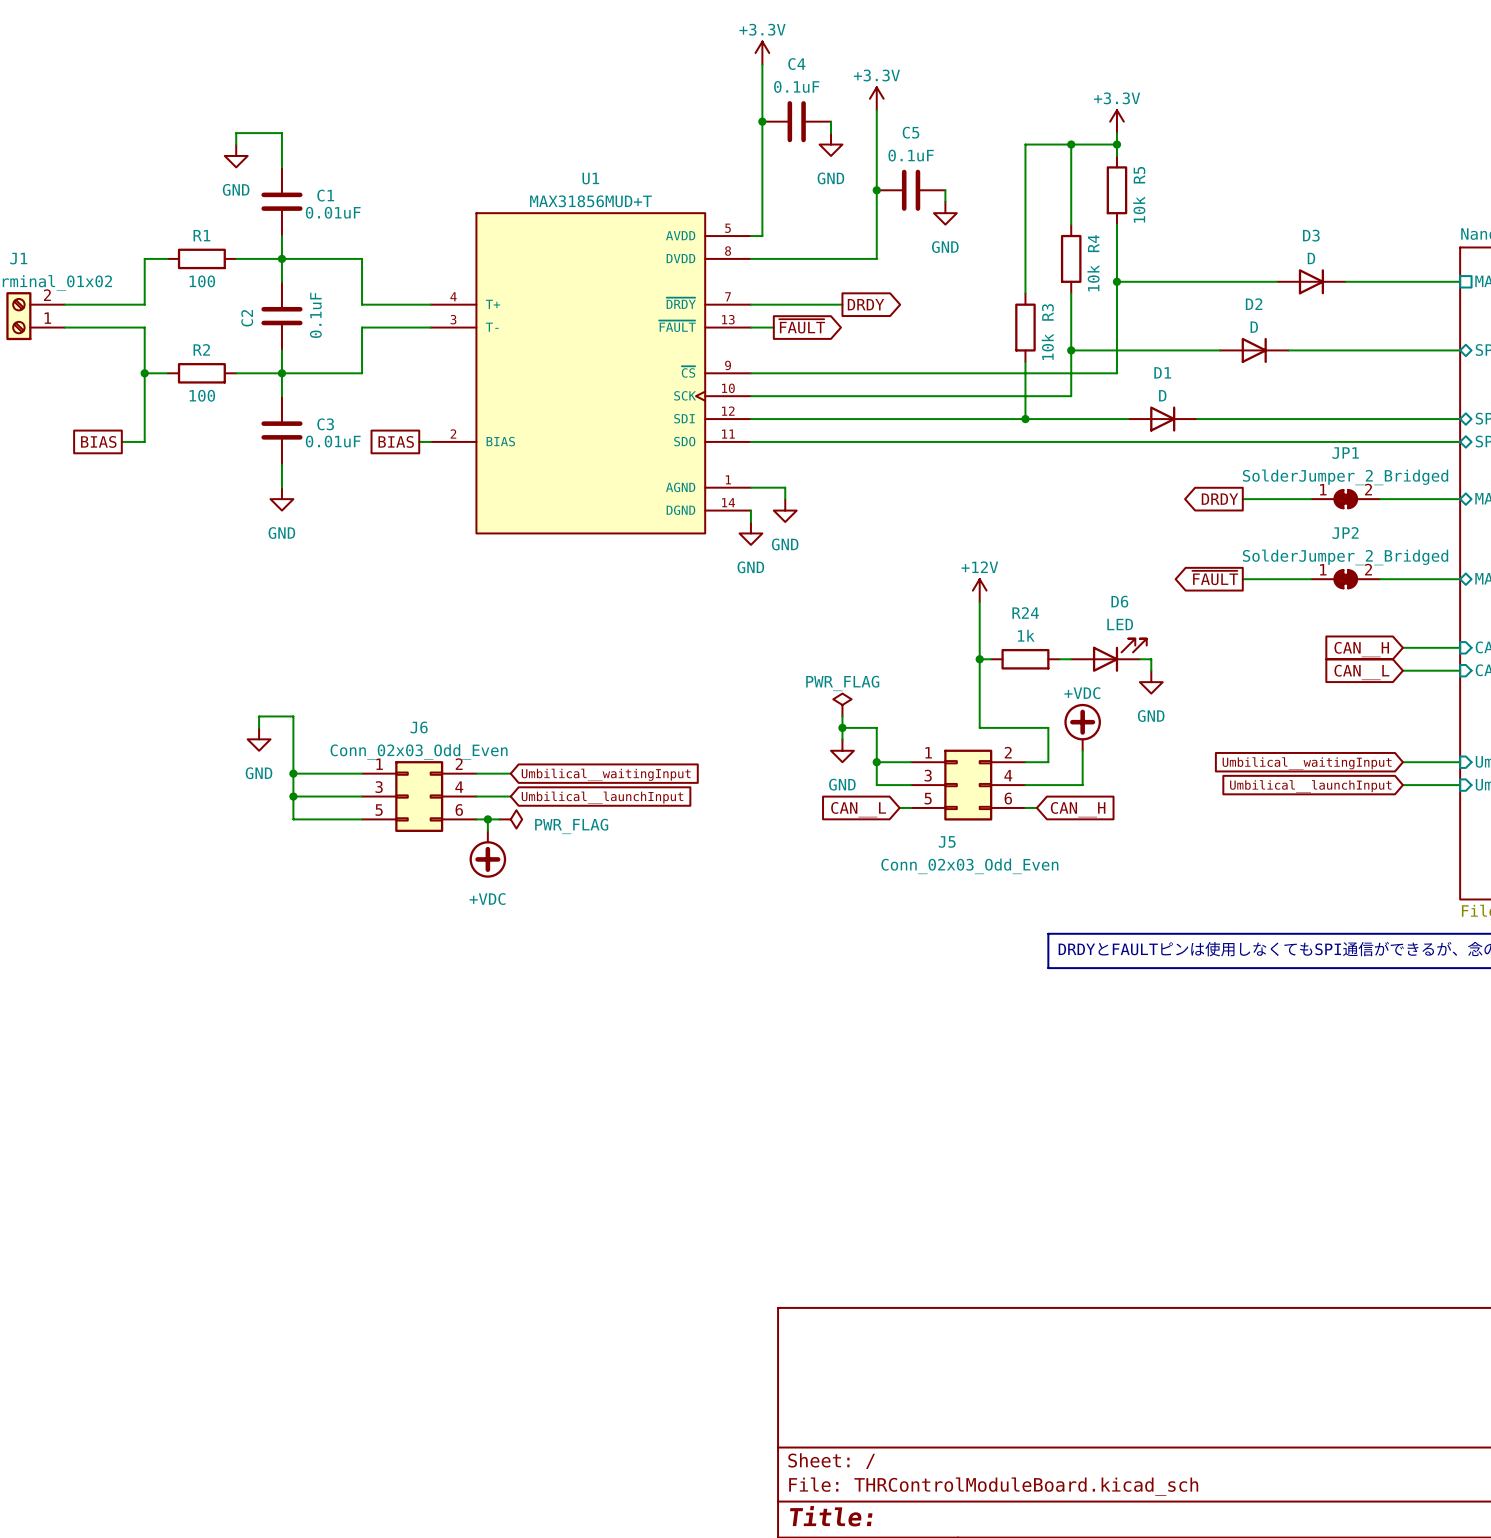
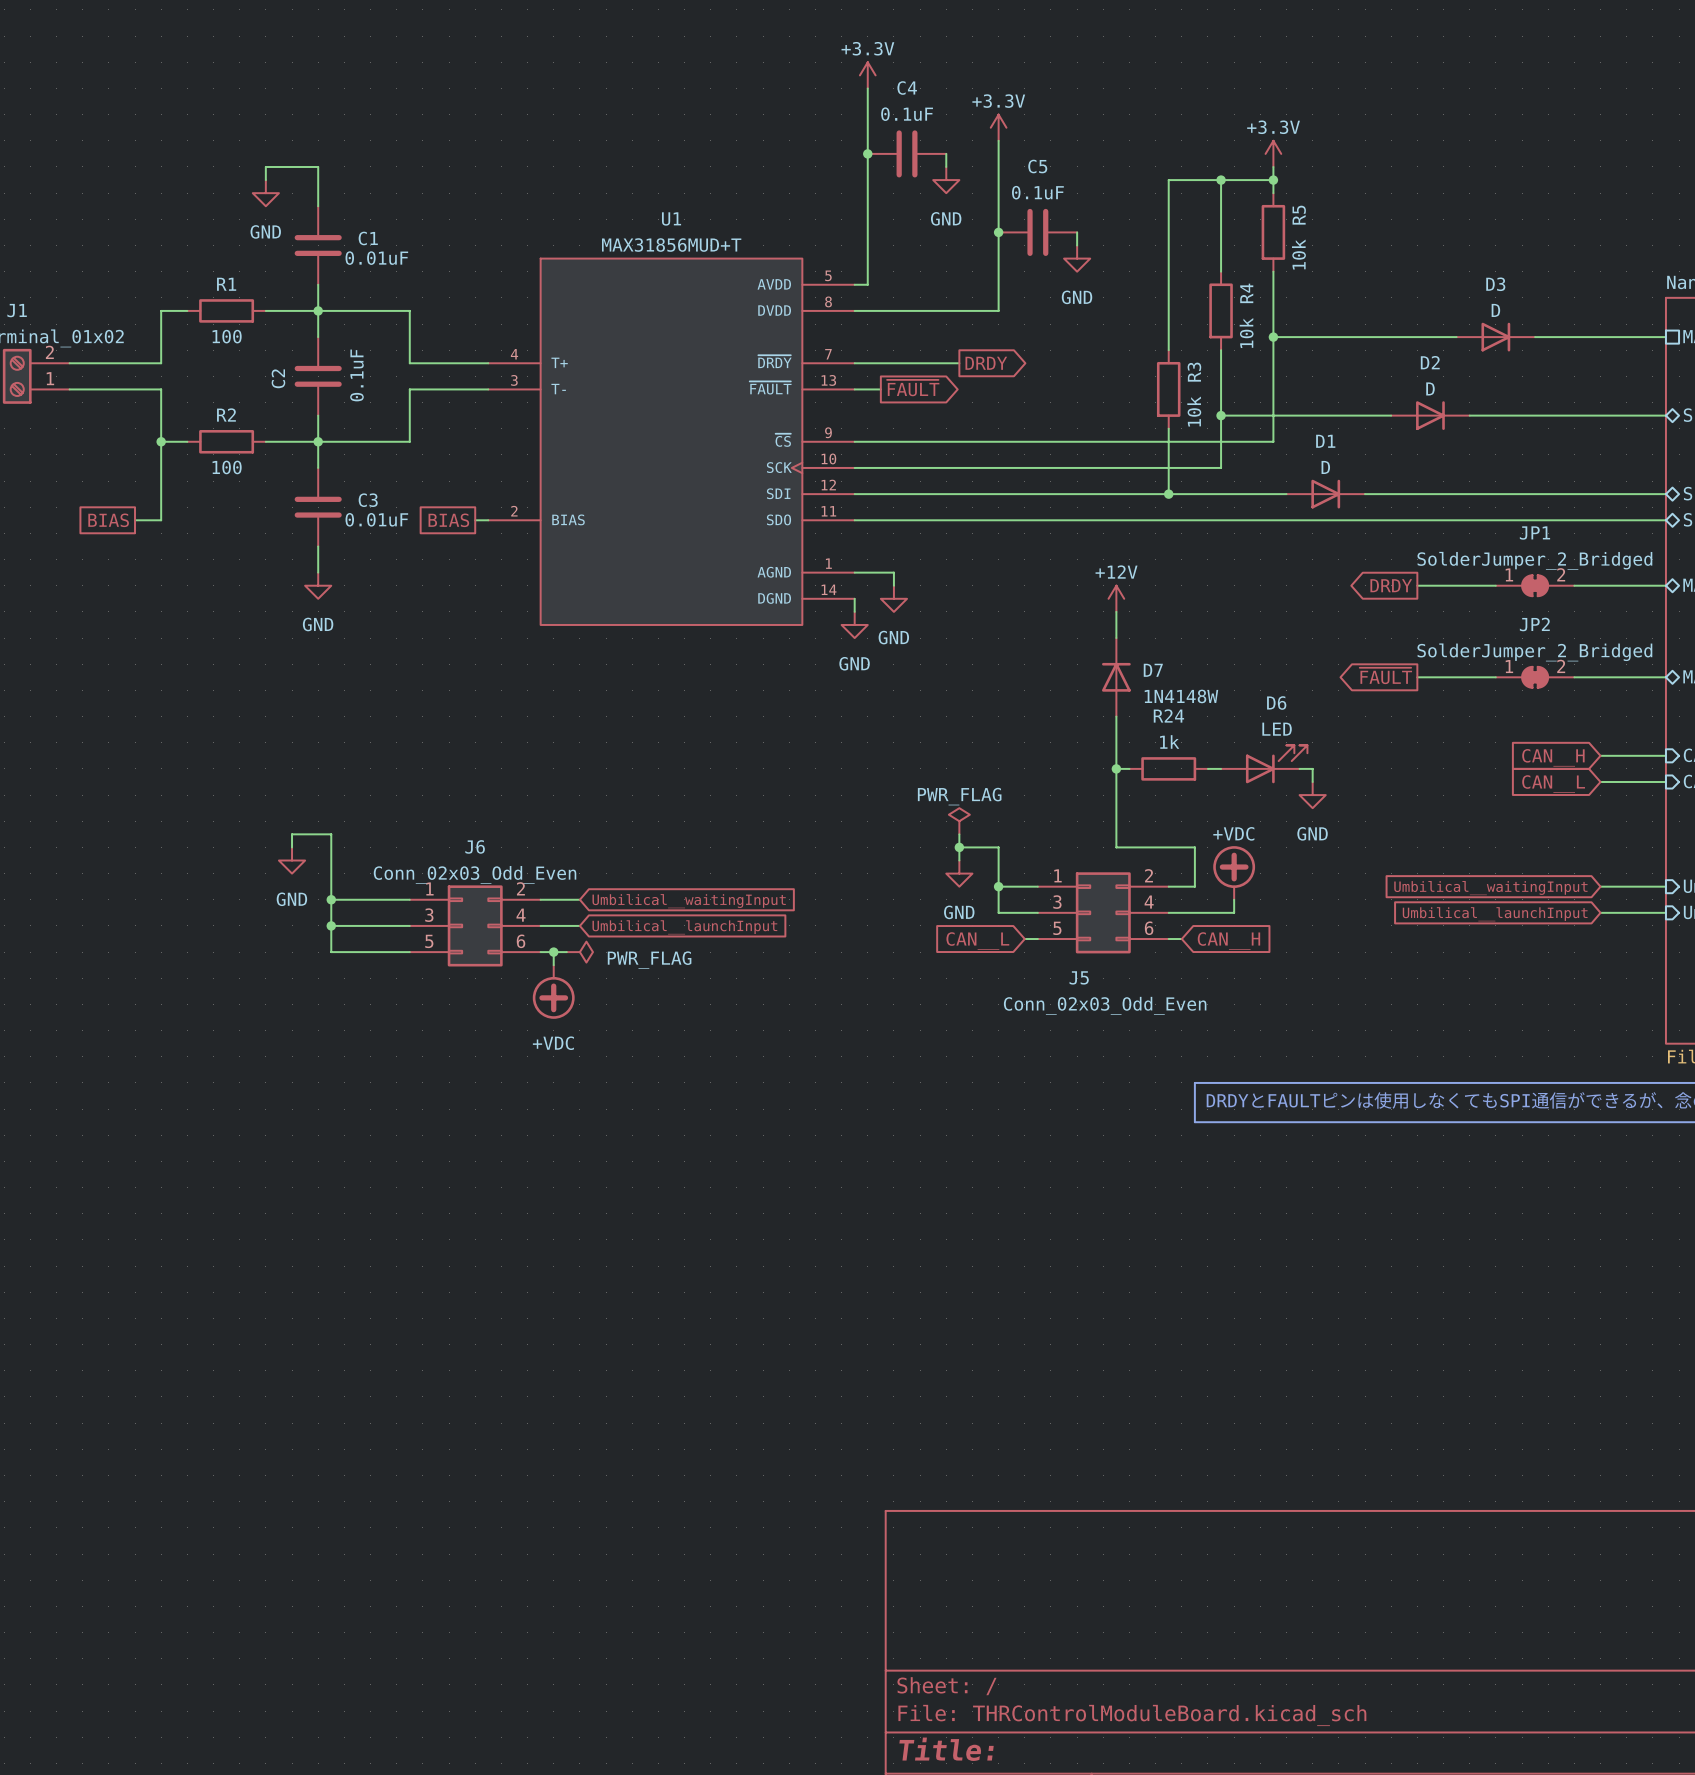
wire: none -> (1116, 611) (1116, 638)
D7: none -> 1N4148W (1116, 677)
power symbol position: +12V (979, 590) -> +12V (1116, 598)
power symbol position: +VDC (1082, 727) -> +VDC (1234, 872)

